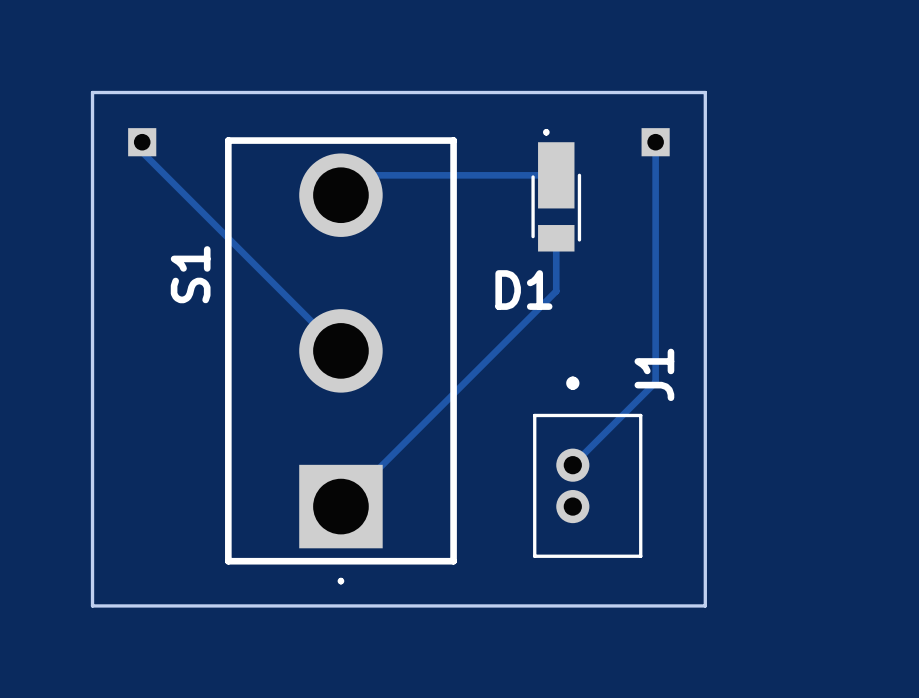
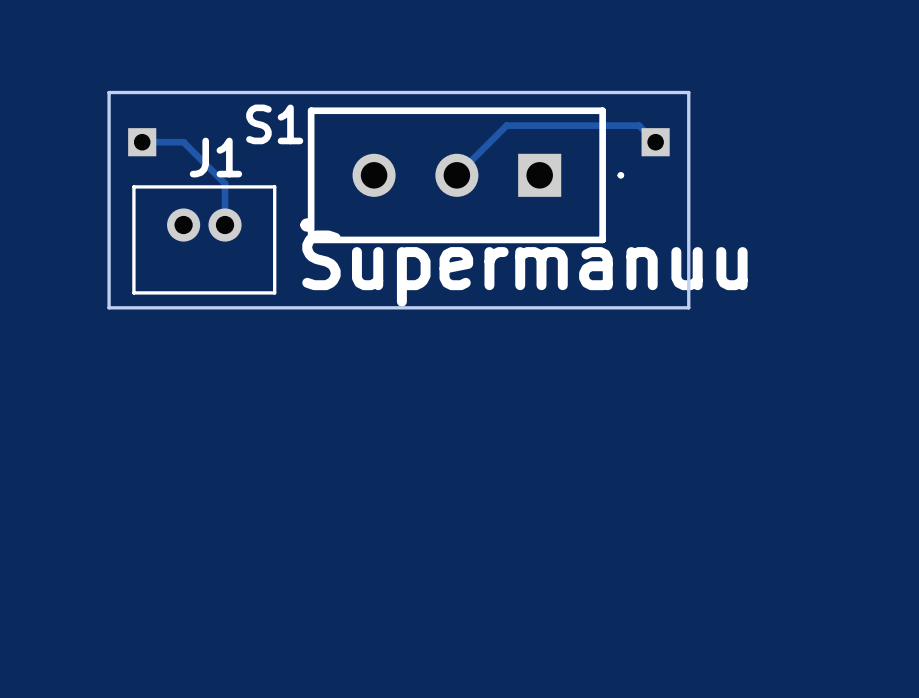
board edge: (109, 92) (92, 92) (92, 605) (705, 605) (705, 92) (688, 92) -> (109, 92) (109, 307) (688, 307) (688, 92)
S1 footprint: [225, 137, 457, 585] -> [307, 107, 625, 244]
track: (142, 142) (142, 152) (340, 350) -> (142, 142) (183, 142) (225, 183) (225, 225)
track: (655, 142) (655, 382) (572, 465) -> (655, 142) (639, 125) (506, 125) (456, 175)
track: (556, 175) (360, 175) (340, 195) -> none
D1: (556, 190) -> none
track: (556, 238) (556, 291) (340, 506) -> none
text: none -> Supermanuu (524, 268)
J1 name position: J1 (654, 374) -> J1 (215, 157)
J1 rotation: 0° (587, 467) -> 90° clockwise (222, 239)
J1 position: (587, 467) -> (222, 239)

